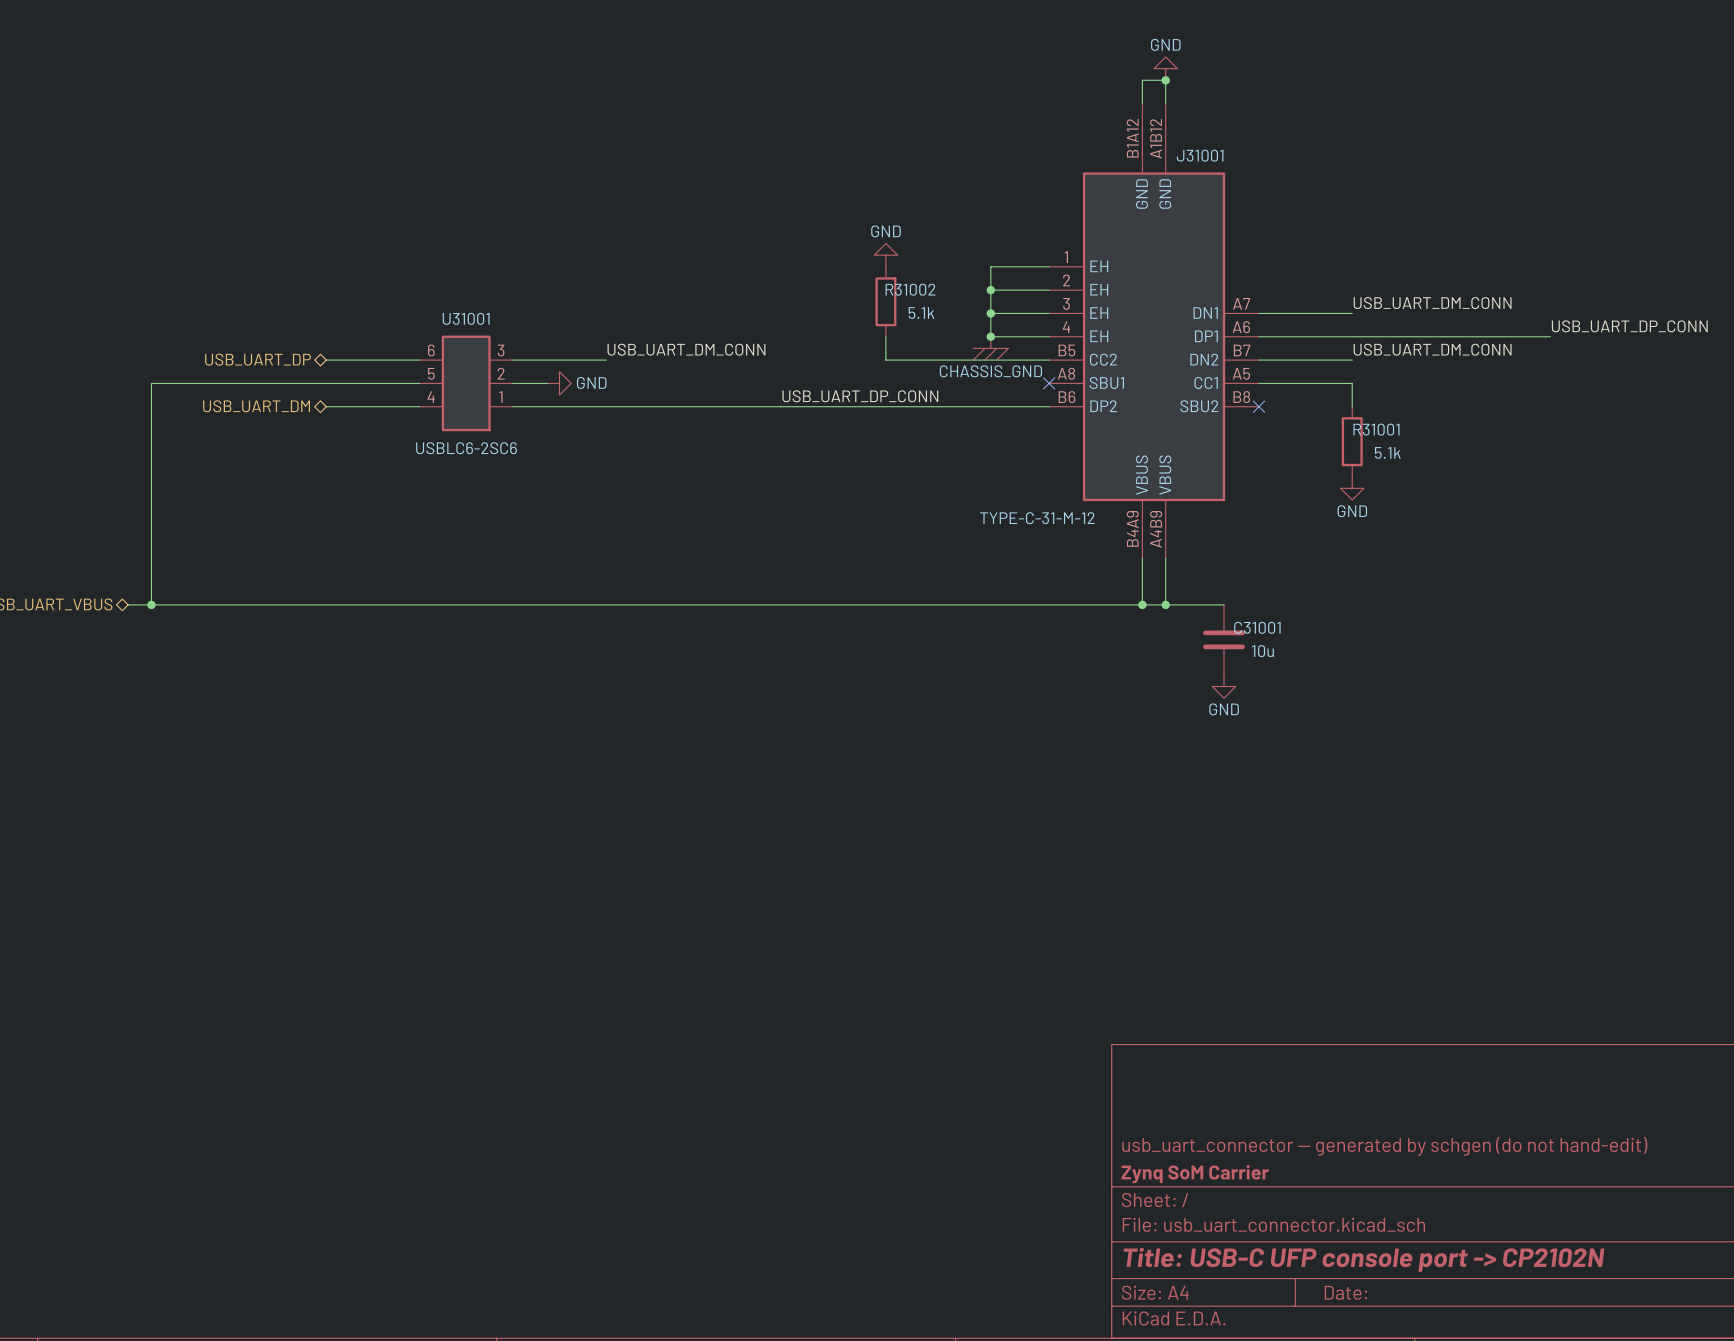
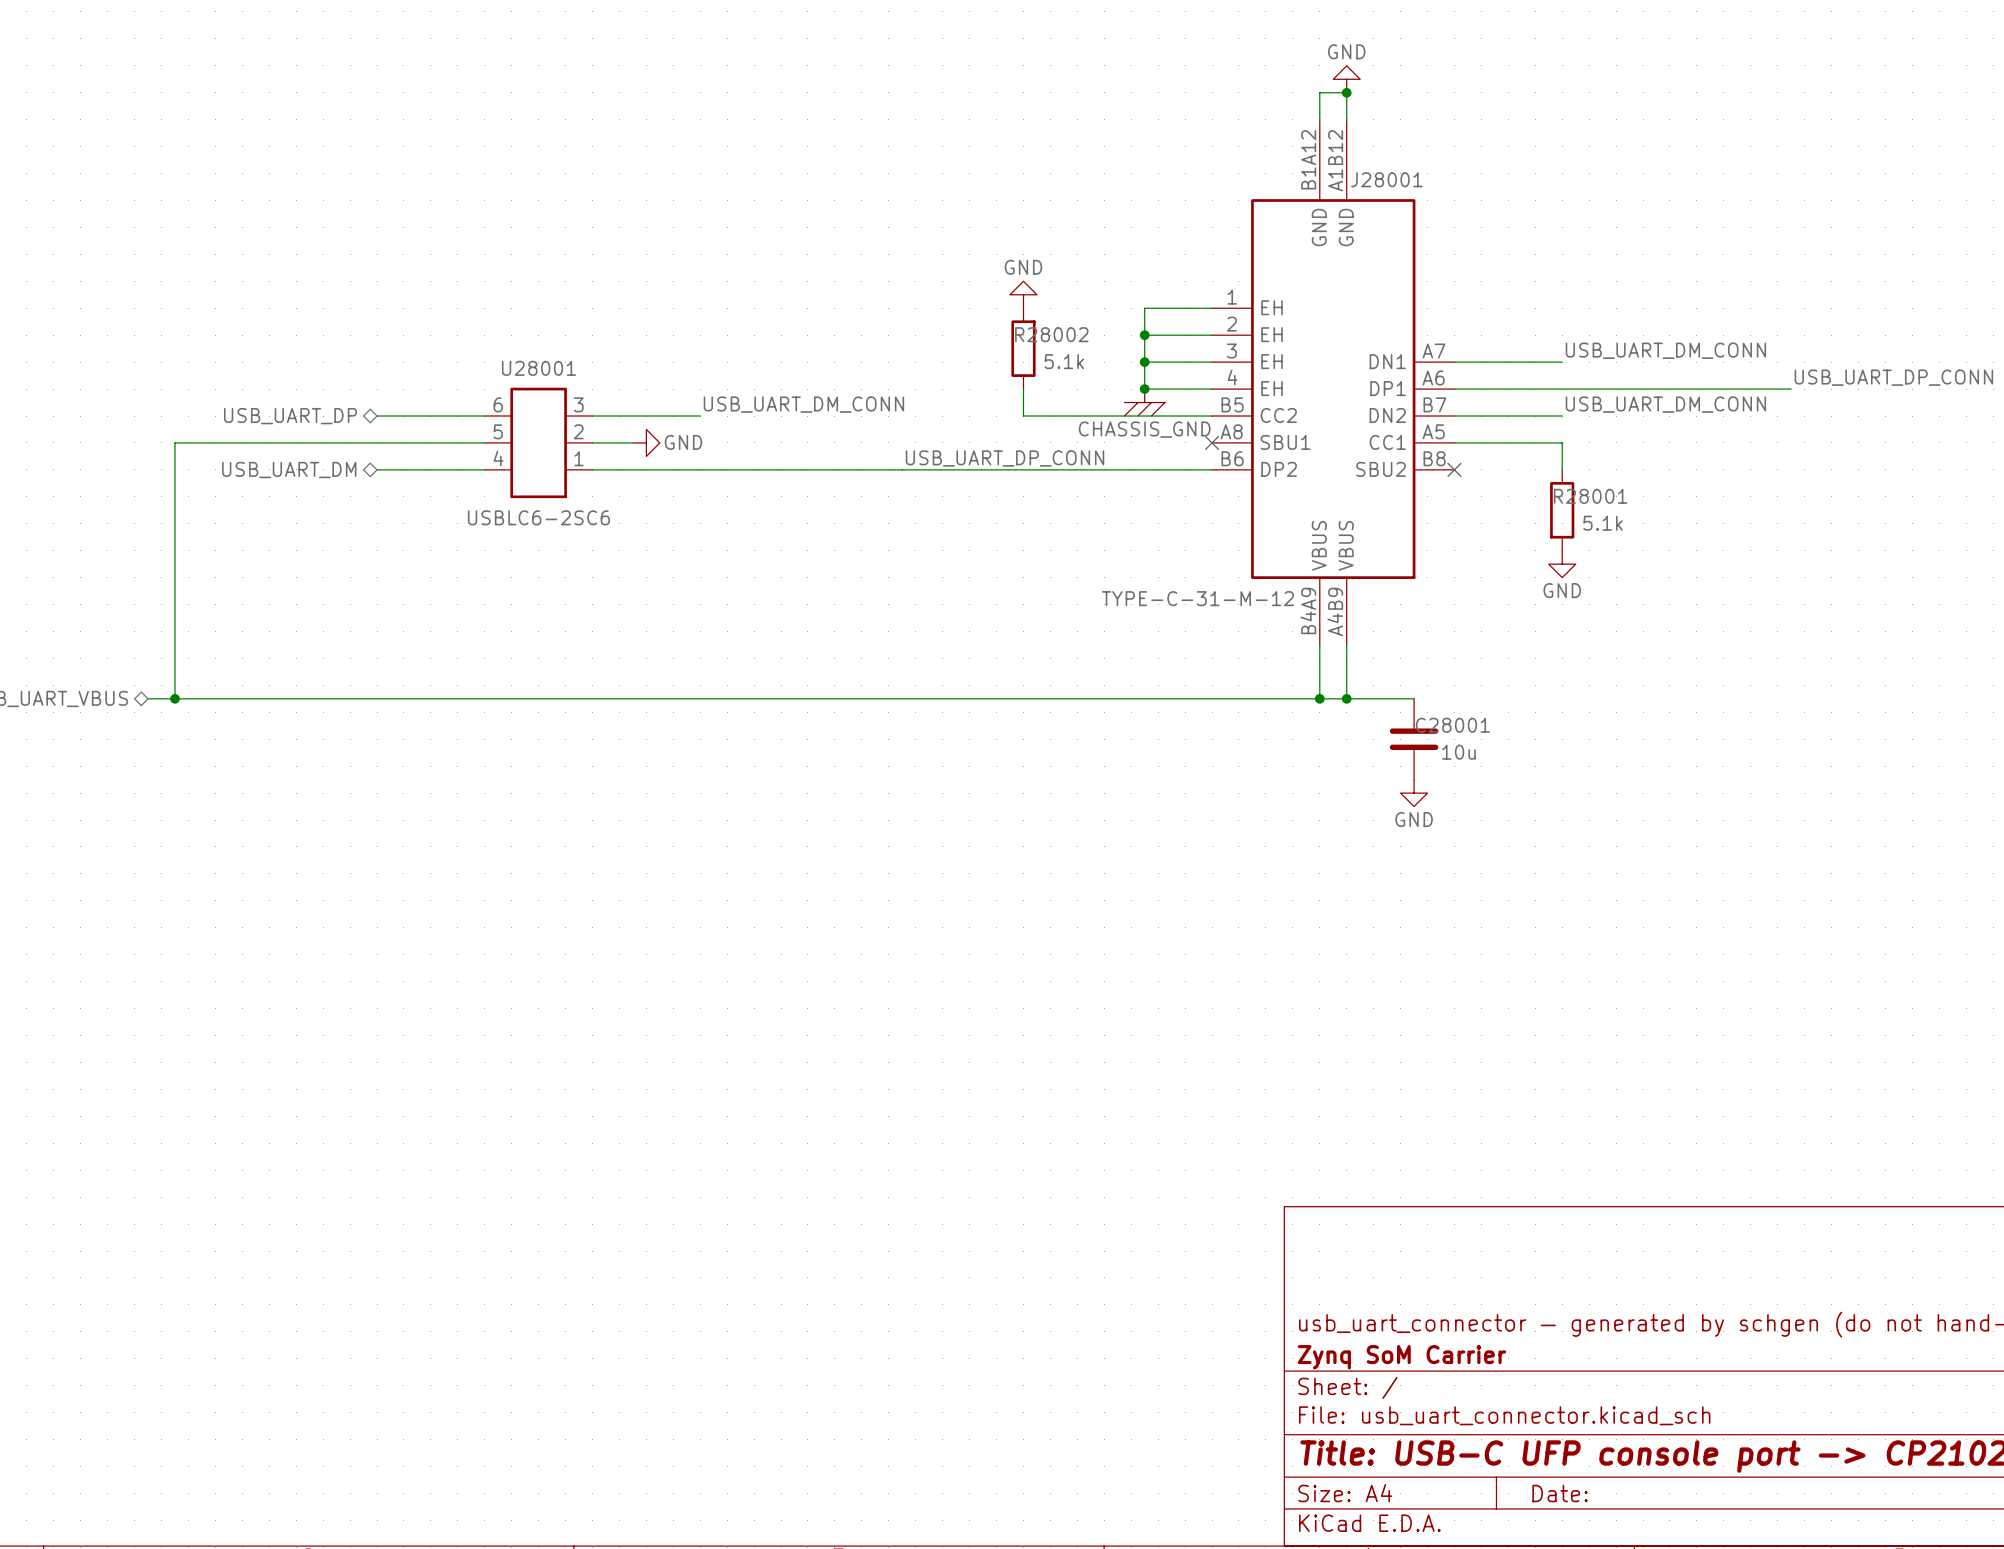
J31001 name: J31001 (1200, 155) -> J28001 (1386, 179)
R31002 name: R31002 (910, 289) -> R28002 (1051, 334)
U31001 name: U31001 (466, 318) -> U28001 (538, 368)
R31001 name: R31001 (1376, 429) -> R28001 (1590, 496)
C31001 name: C31001 (1257, 627) -> C28001 (1452, 725)

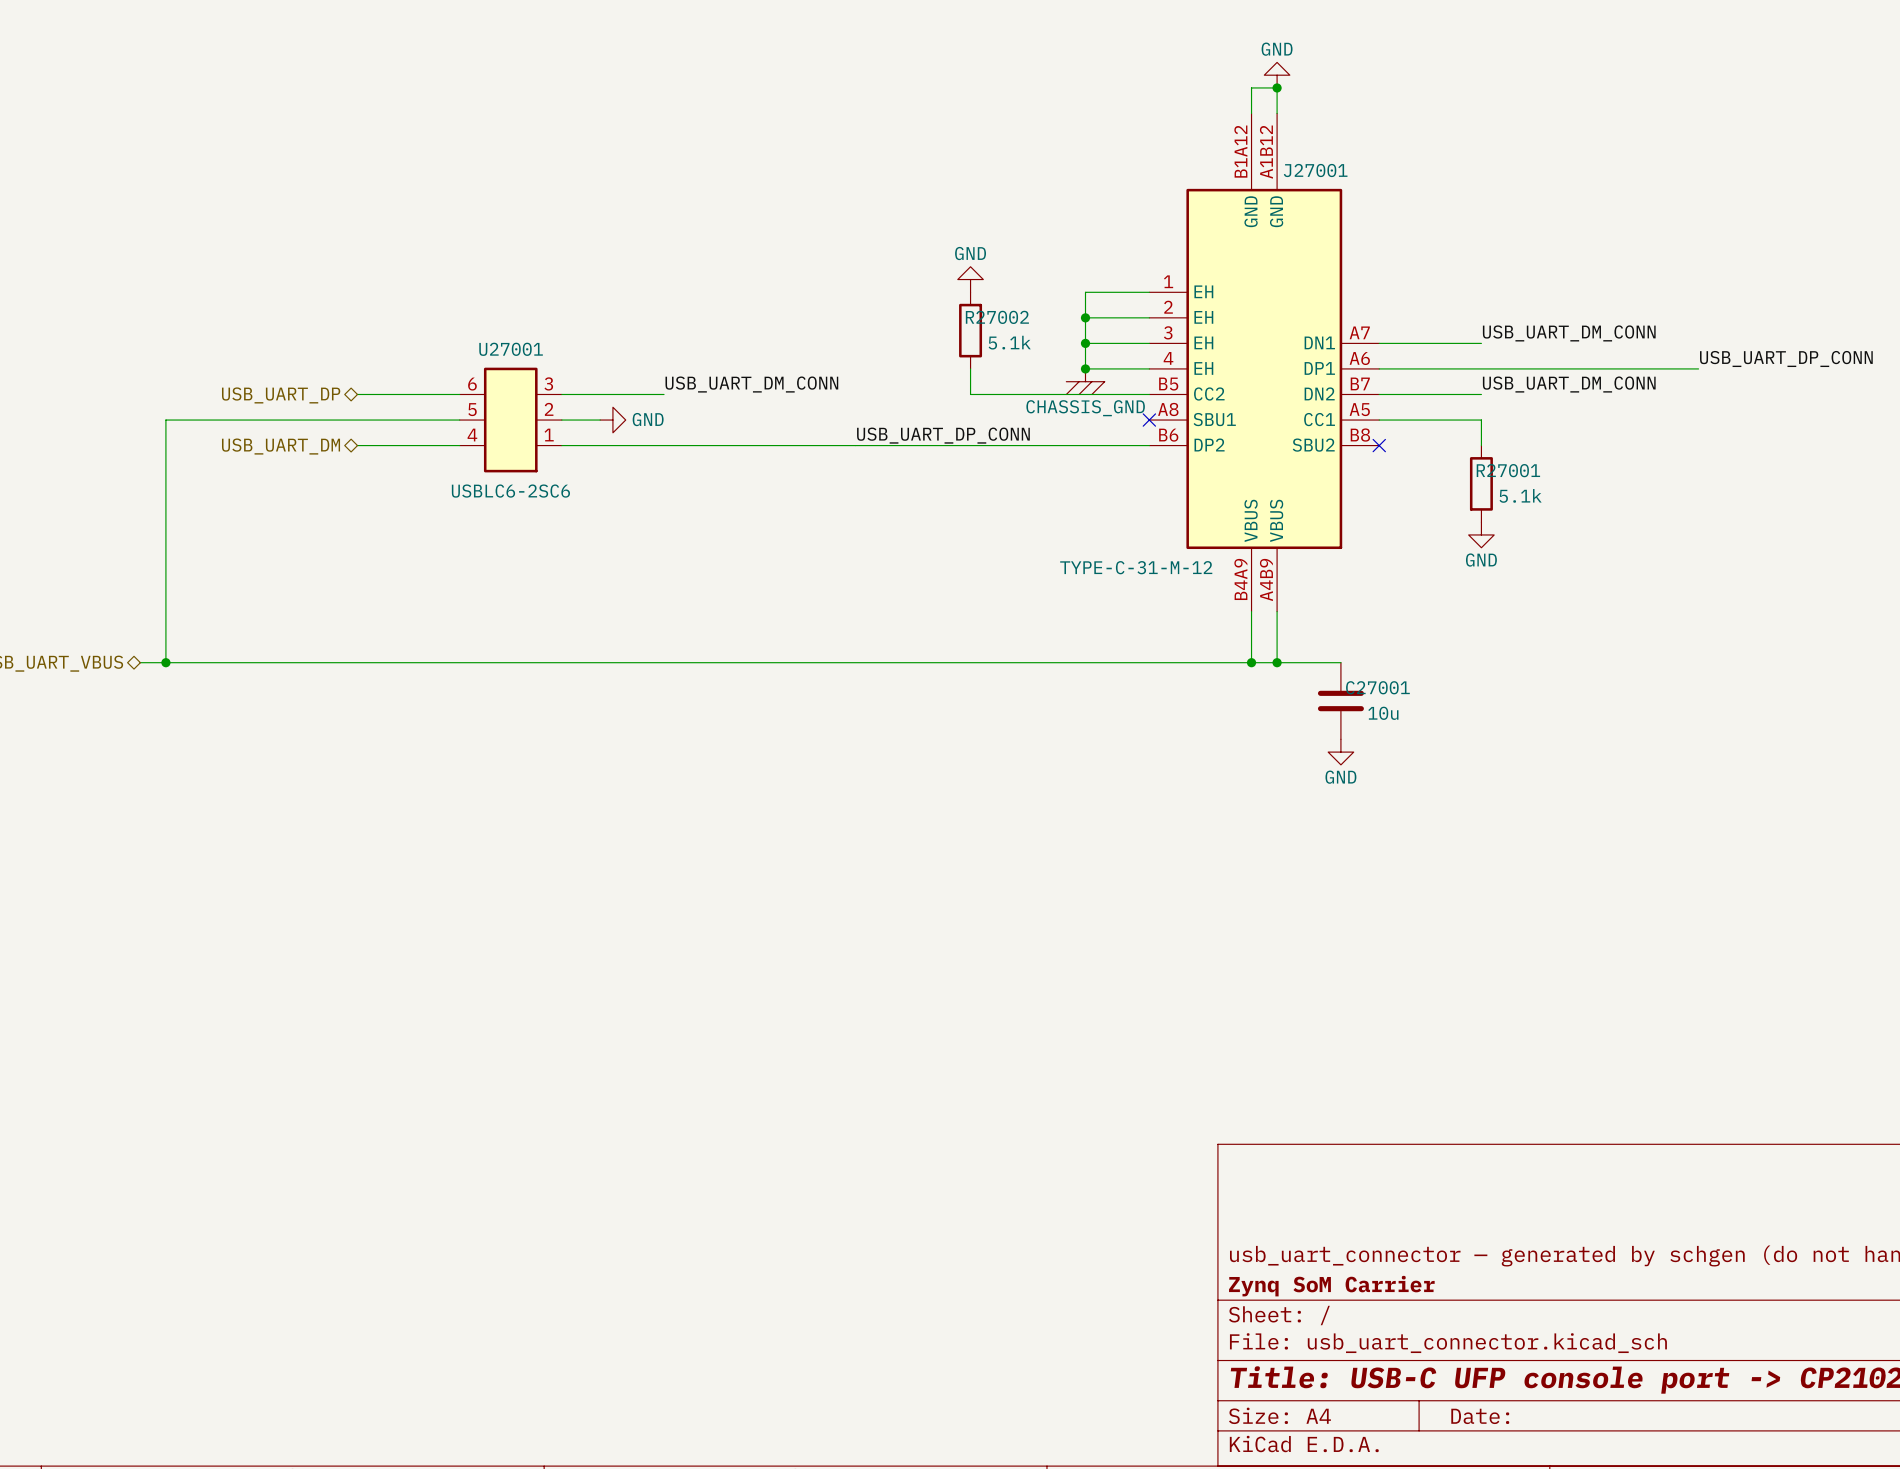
J28001 name: J28001 (1386, 179) -> J27001 (1315, 170)
R28002 name: R28002 (1051, 334) -> R27002 (997, 317)
U28001 name: U28001 (538, 368) -> U27001 (511, 349)
R28001 name: R28001 (1590, 496) -> R27001 (1508, 470)
C28001 name: C28001 (1452, 725) -> C27001 (1377, 687)

